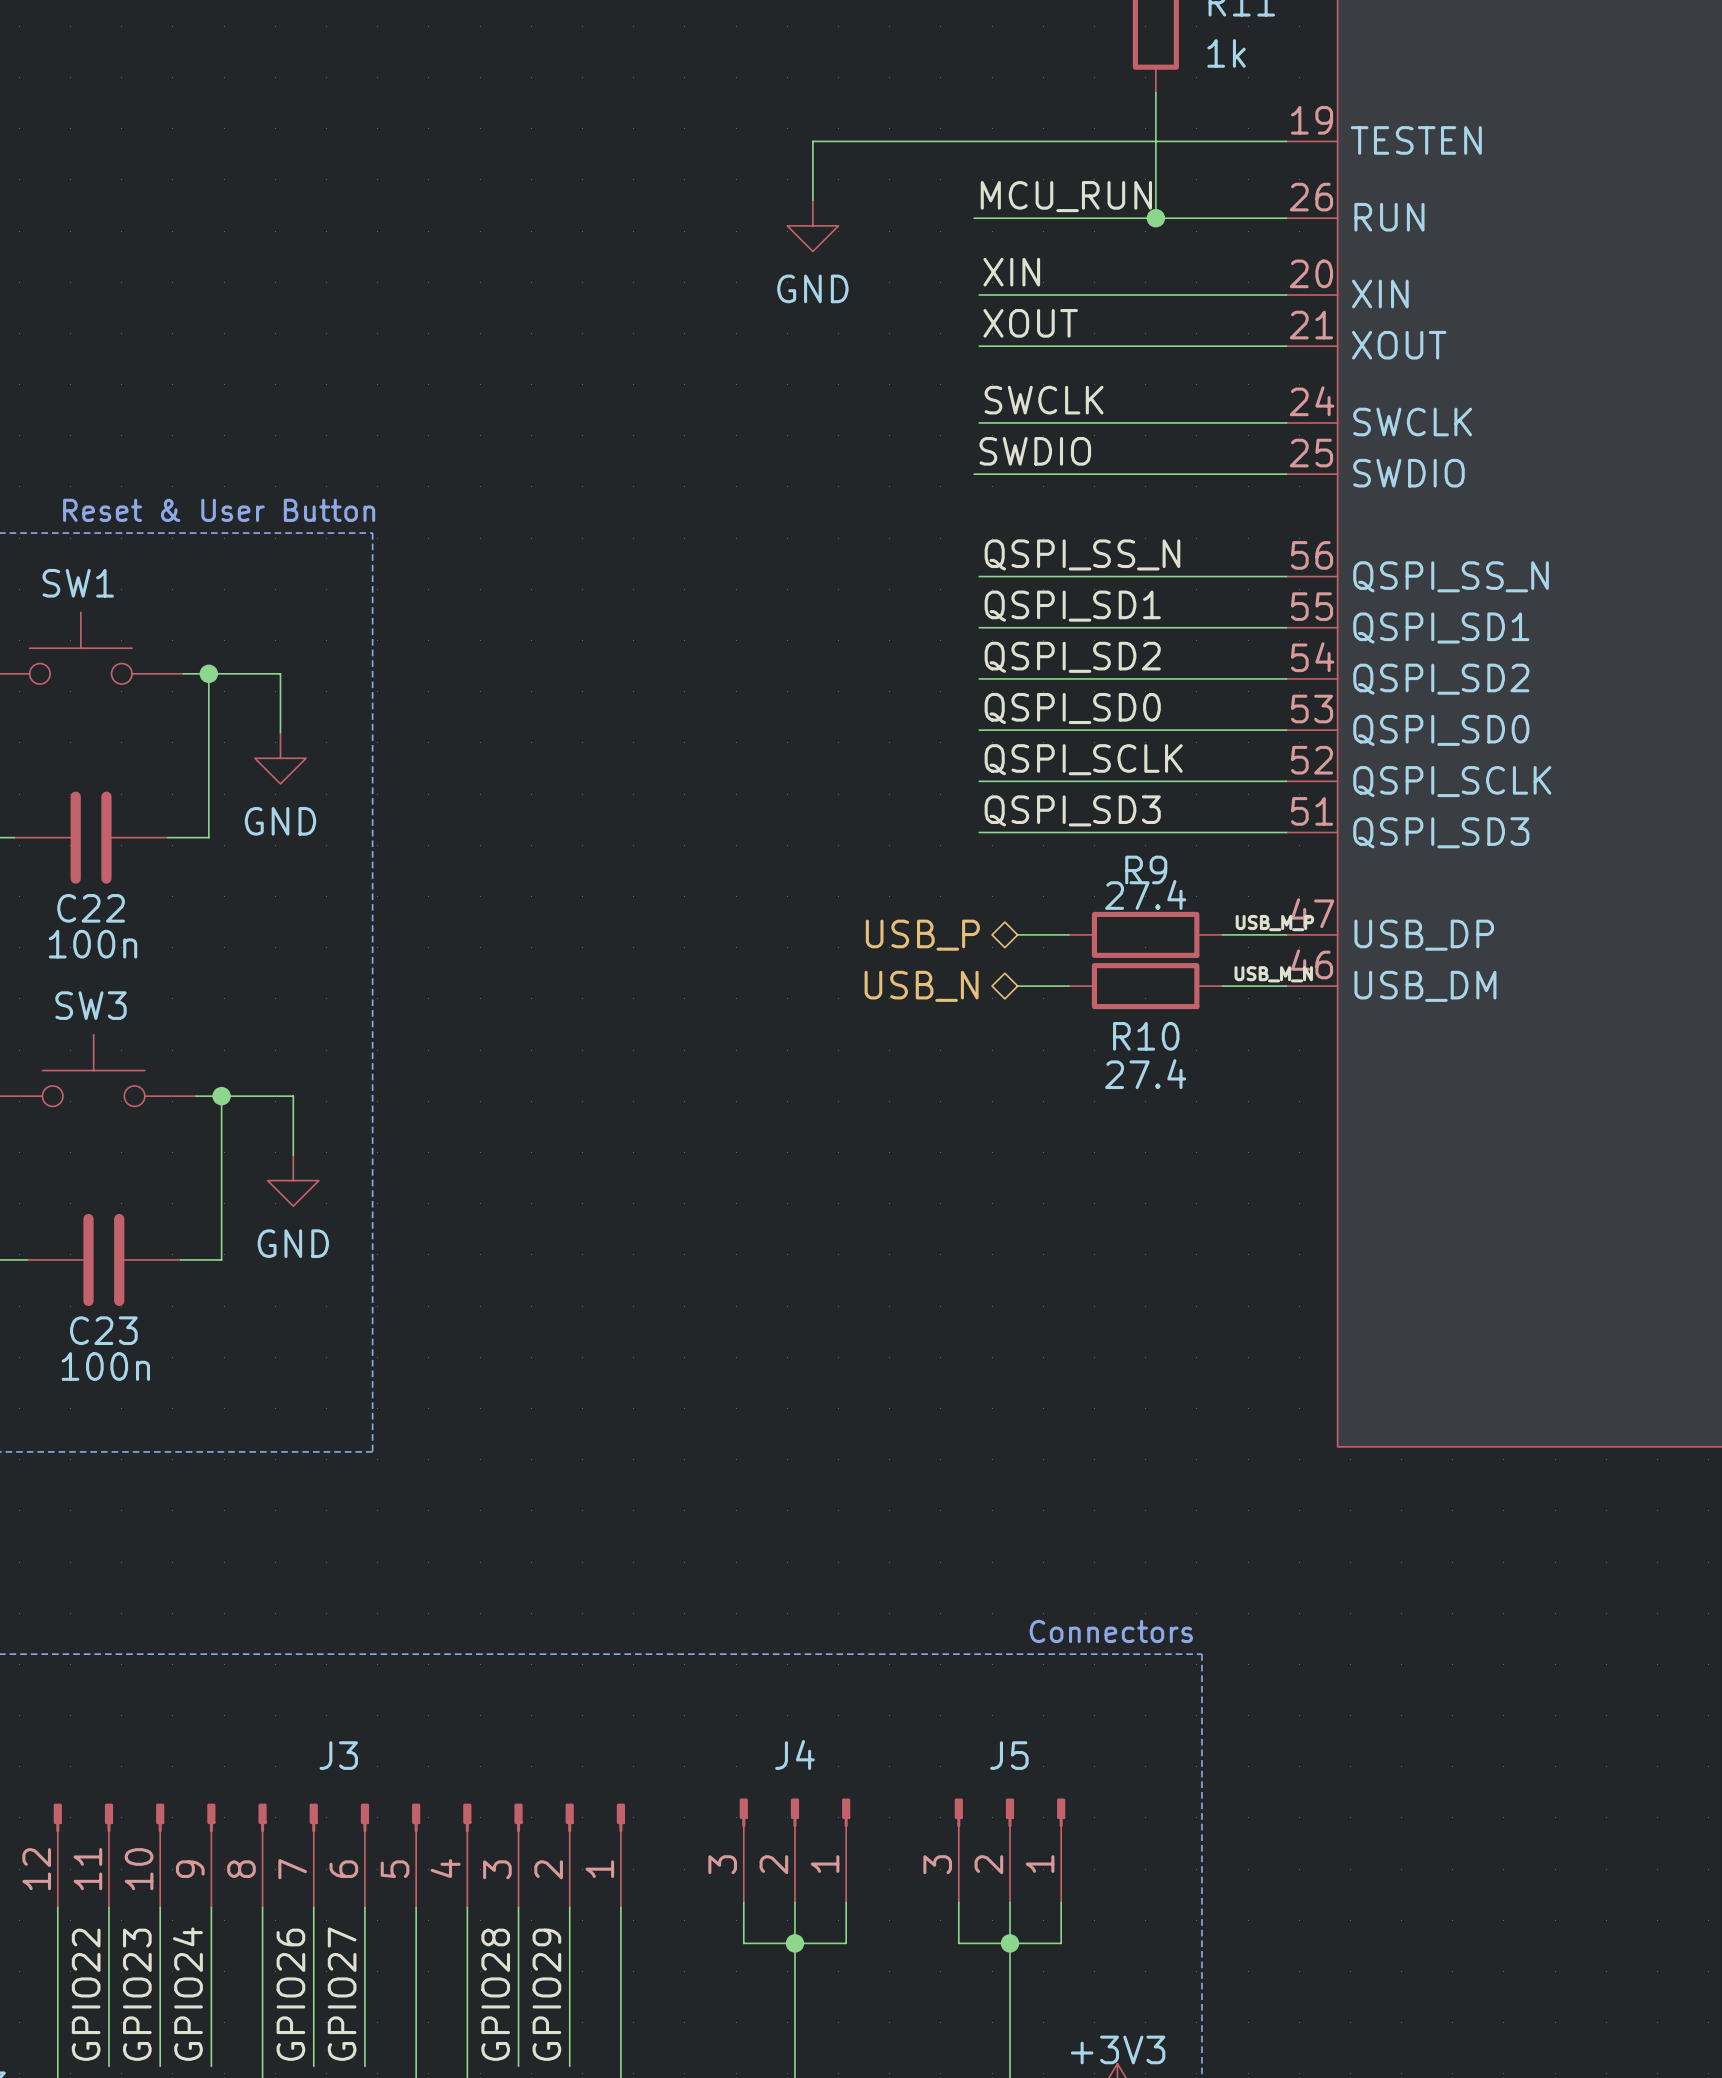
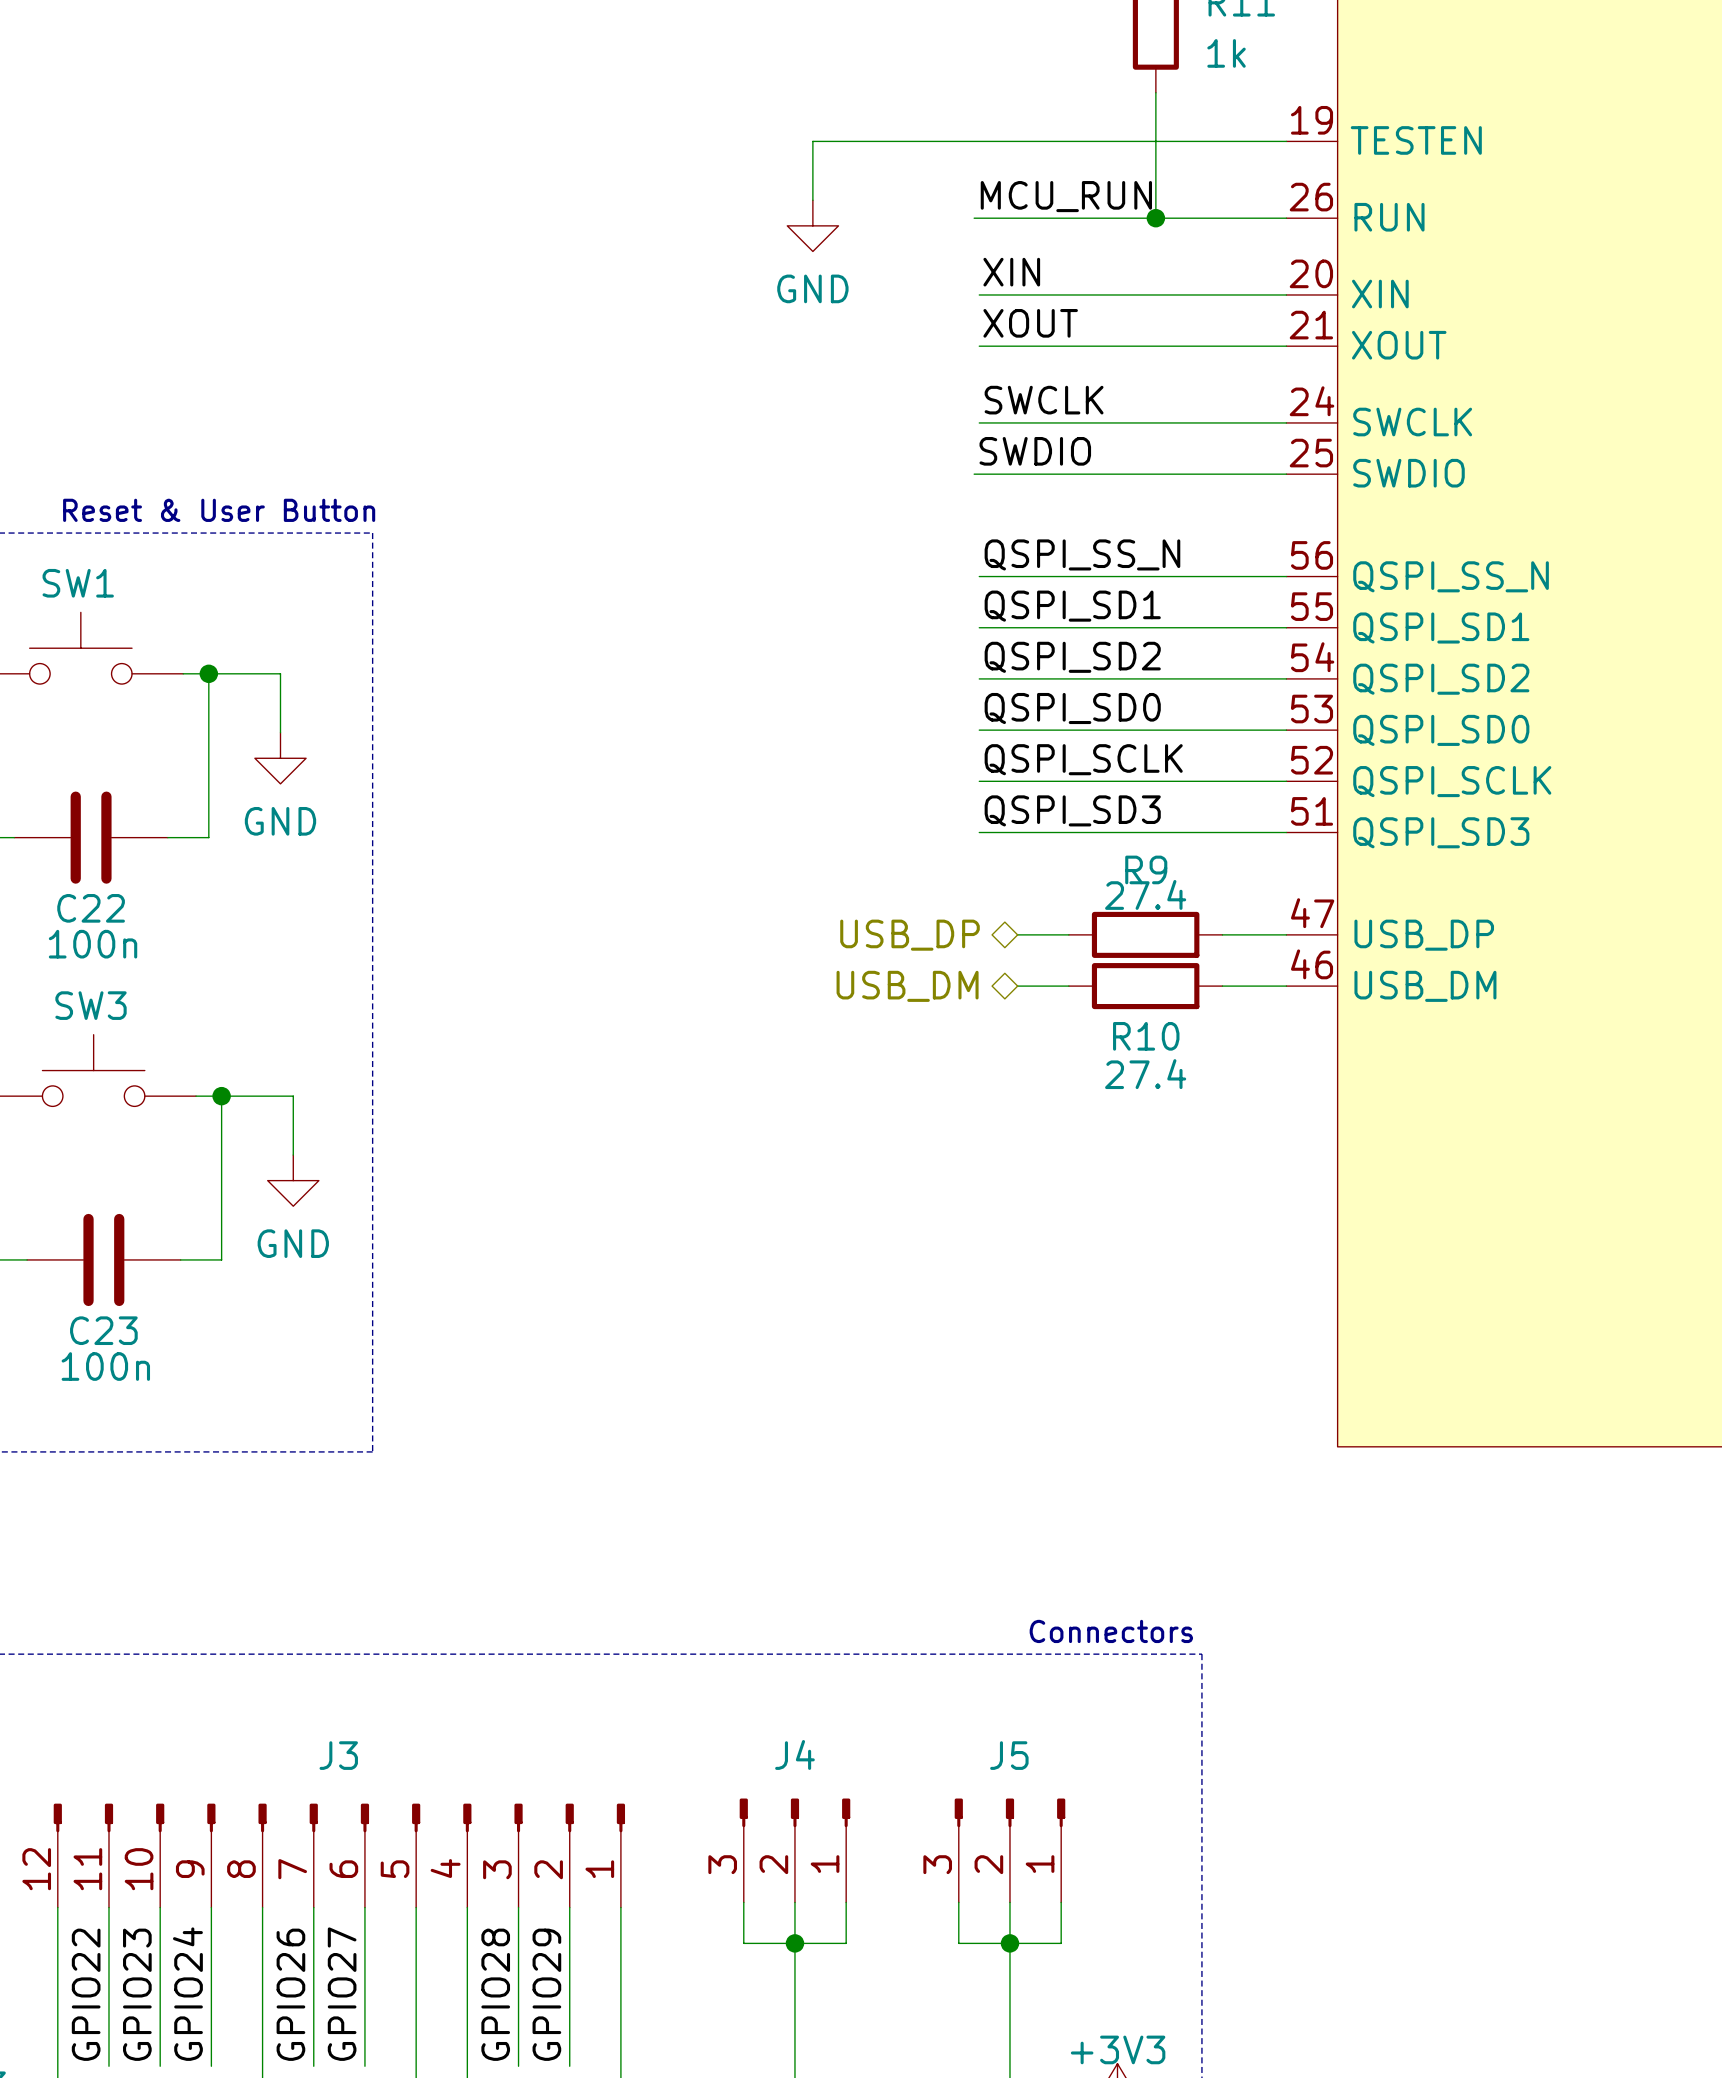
label: USB_M_P (1274, 923) -> none
hierarchical label: USB_P (922, 935) -> USB_DP (910, 935)
label: USB_M_N (1273, 974) -> none
hierarchical label: USB_N (921, 986) -> USB_DM (907, 986)

